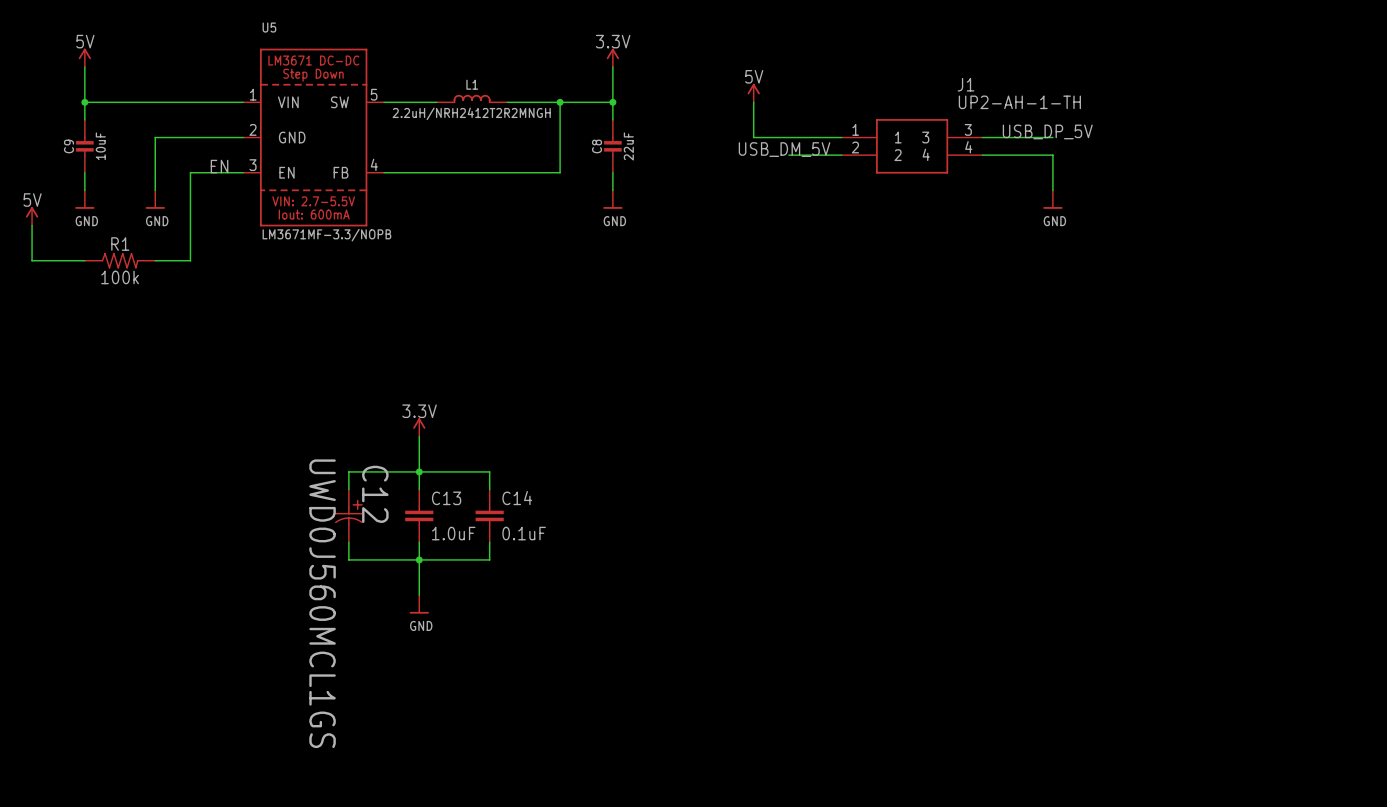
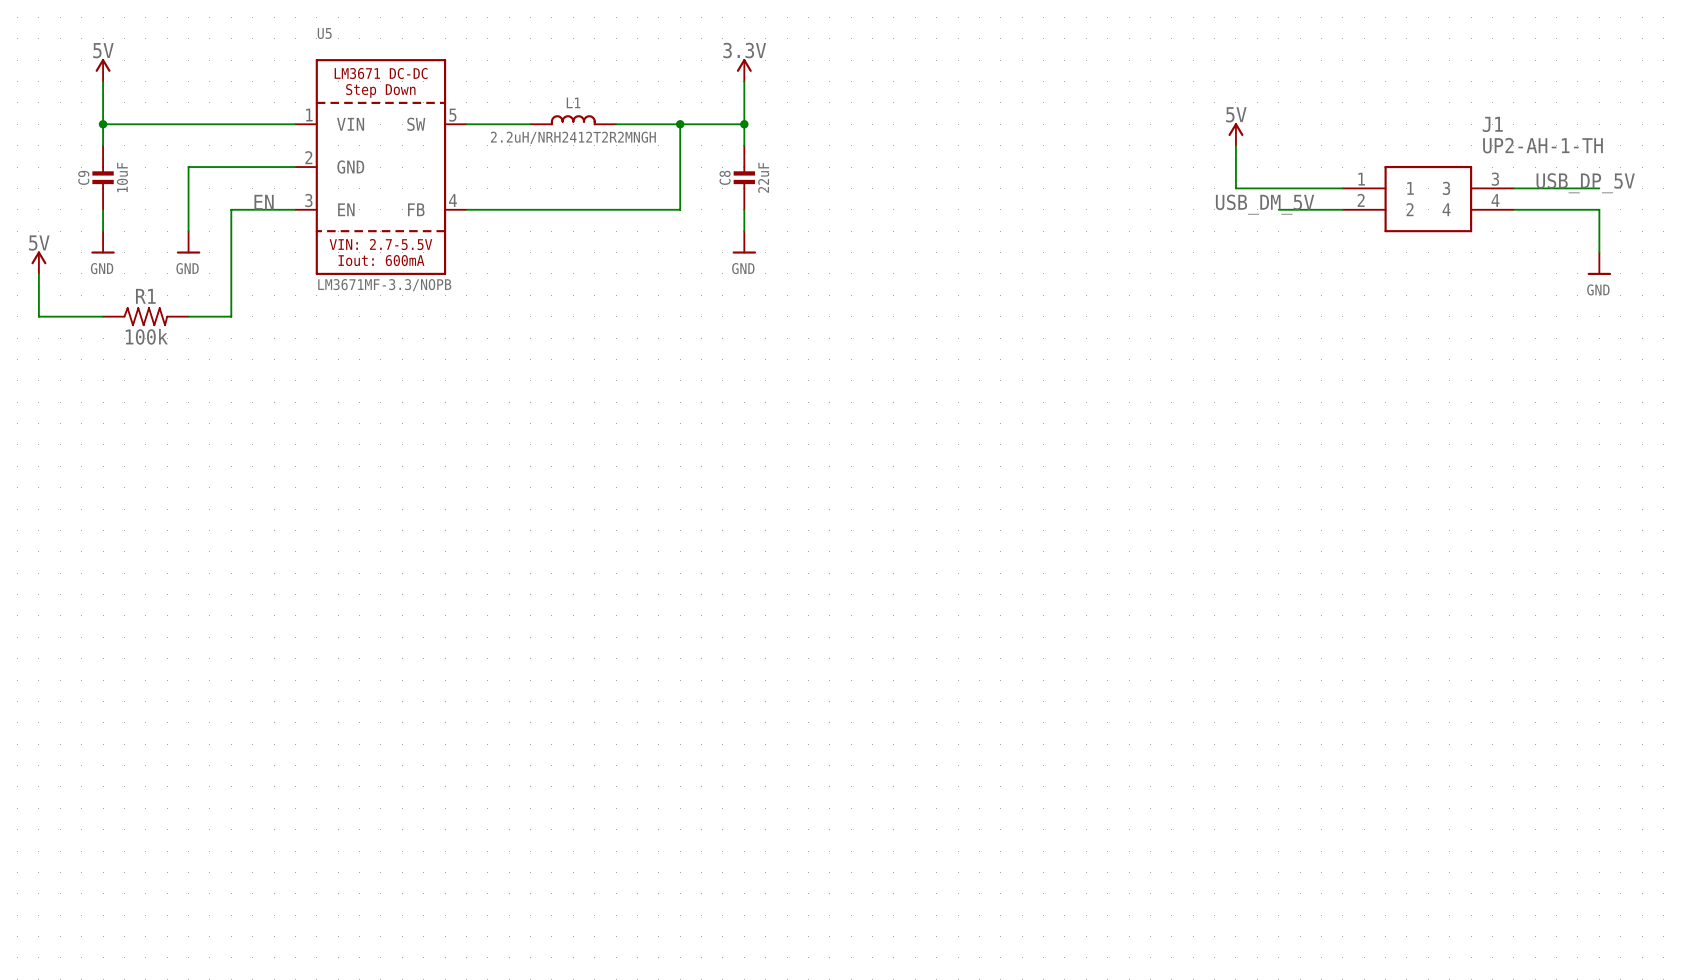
power symbol: 5V (753, 93) -> none
wire: (753, 102) (753, 137) (841, 137) -> none
power symbol: none -> 5V (1235, 134)
label: USB_DP_5V (1047, 131) -> none
wire: (982, 137) (1052, 137) -> none
J1 position: (912, 146) -> (1428, 199)
label: USB_DM_5V (784, 149) -> none
label: none -> USB_DP_5V (1585, 183)
wire: (788, 155) (841, 155) -> none
wire: (982, 155) (1017, 155) -> (1235, 145) (1235, 188)
wire: (1052, 155) (1052, 190) -> (1278, 188) (1342, 188)
wire: none -> (1513, 188) (1599, 188)
label: none -> USB_DM_5V (1265, 204)
wire: none -> (1278, 209) (1342, 209)
wire: none -> (1513, 209) (1599, 209) (1599, 252)
power symbol: GND (1052, 199) -> none
power symbol: none -> GND (1599, 263)
power symbol: 3.3V (419, 427) -> none
wire: (419, 436) (419, 489) -> none
junction: (419, 471) -> none
wire: (348, 489) (348, 471) (489, 471) (489, 489) -> none
C12: UWD0J560MCL1GS (348, 515) -> none
C13: 1.0uF (419, 515) -> none
C14: 0.1uF (489, 515) -> none
wire: (348, 542) (348, 559) (489, 559) (489, 542) -> none
wire: (419, 542) (419, 595) -> none
junction: (419, 559) -> none
power symbol: GND (419, 604) -> none

